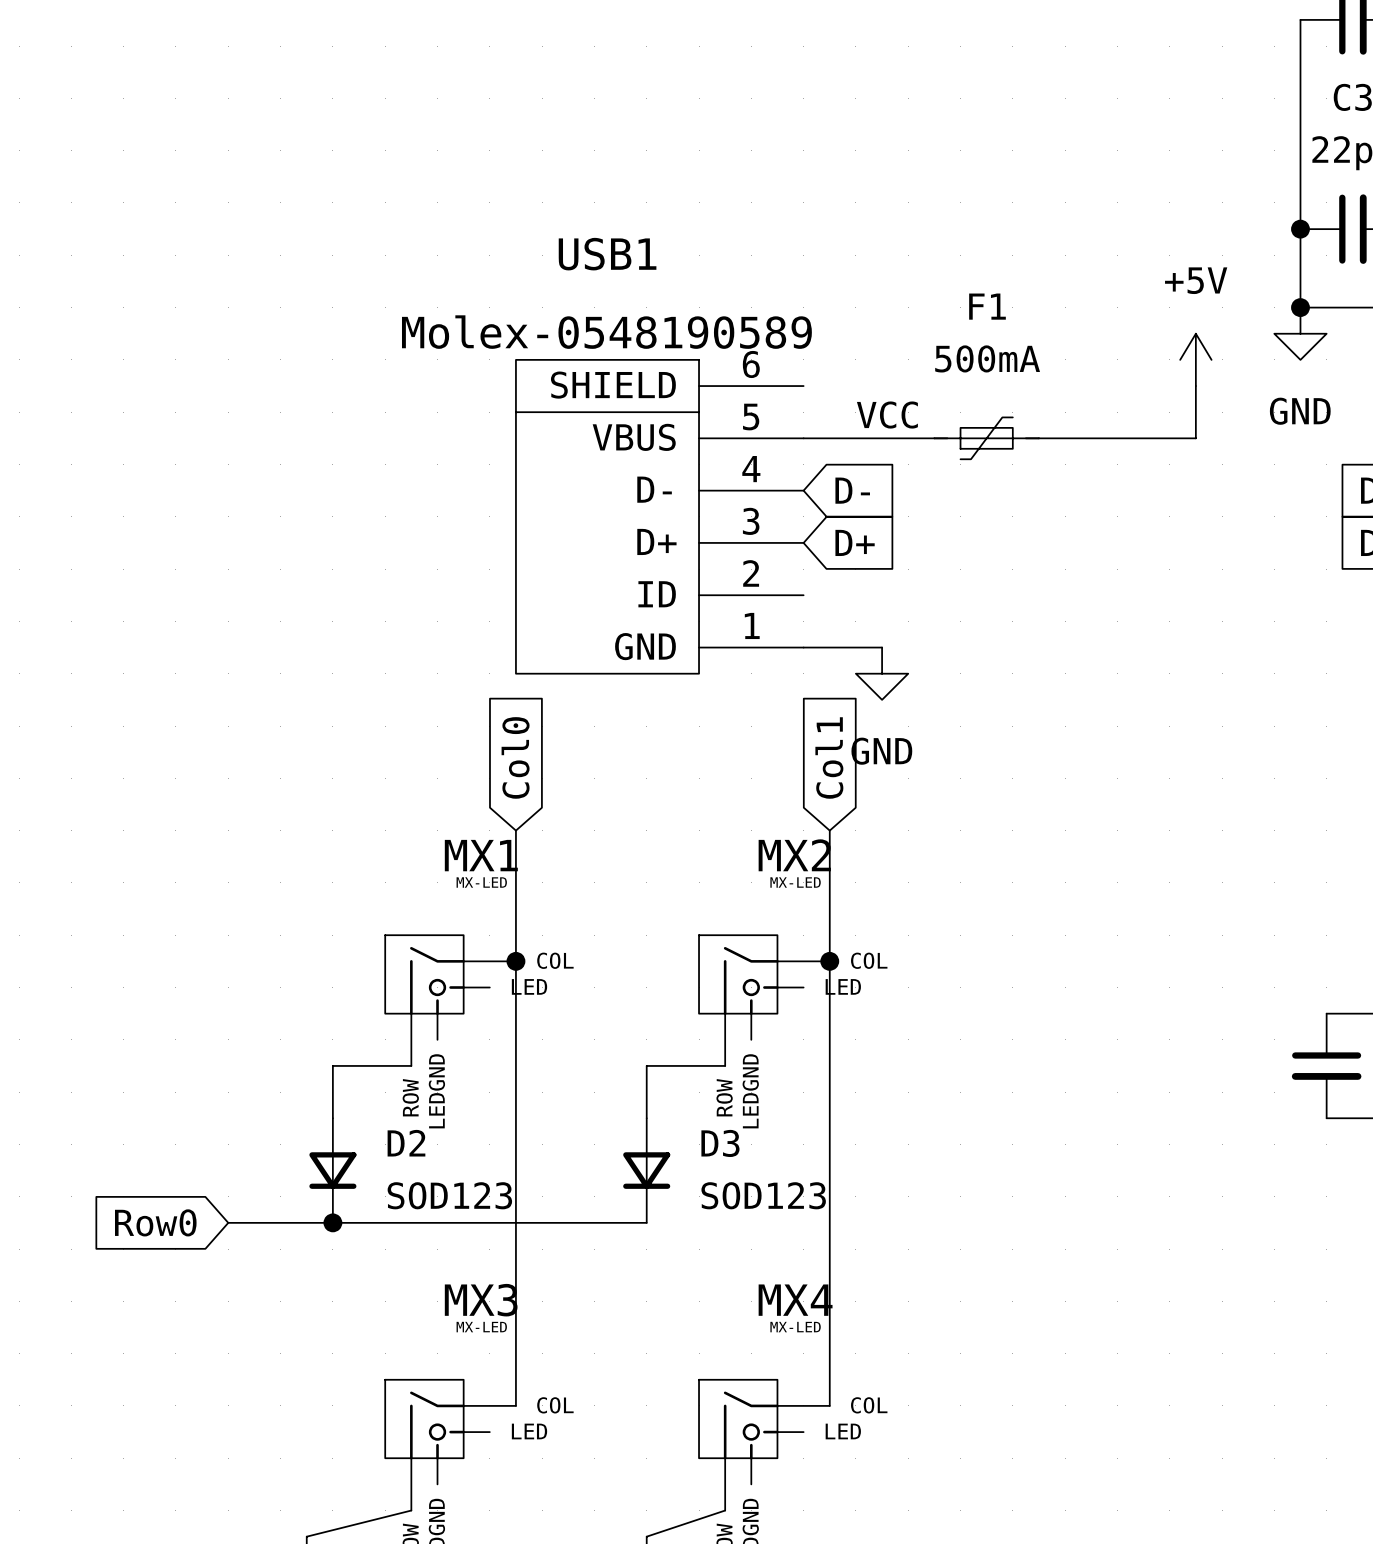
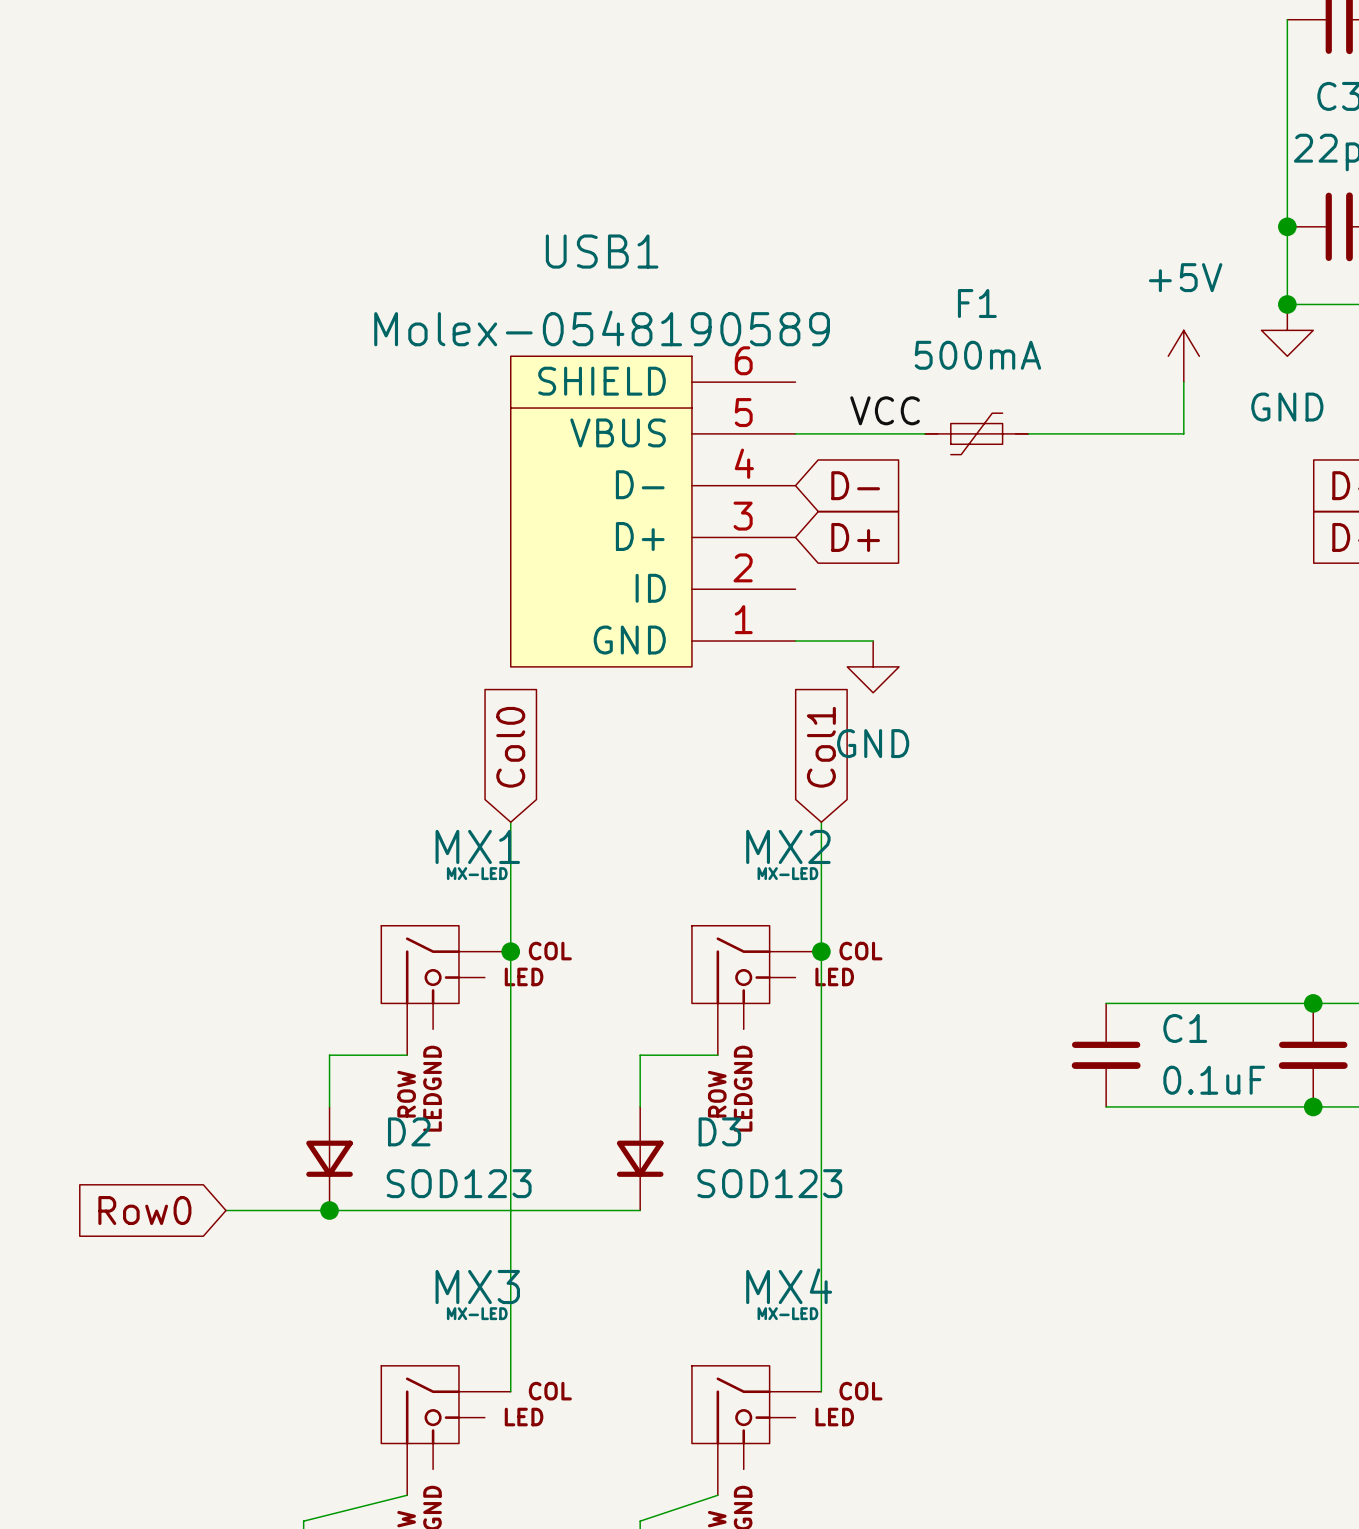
wire: none -> (1106, 1003) (1313, 1003)
junction: none -> (1313, 1003)
C1: none -> 0.1uF (1106, 1055)
wire: none -> (1106, 1106) (1313, 1106)
junction: none -> (1313, 1106)

